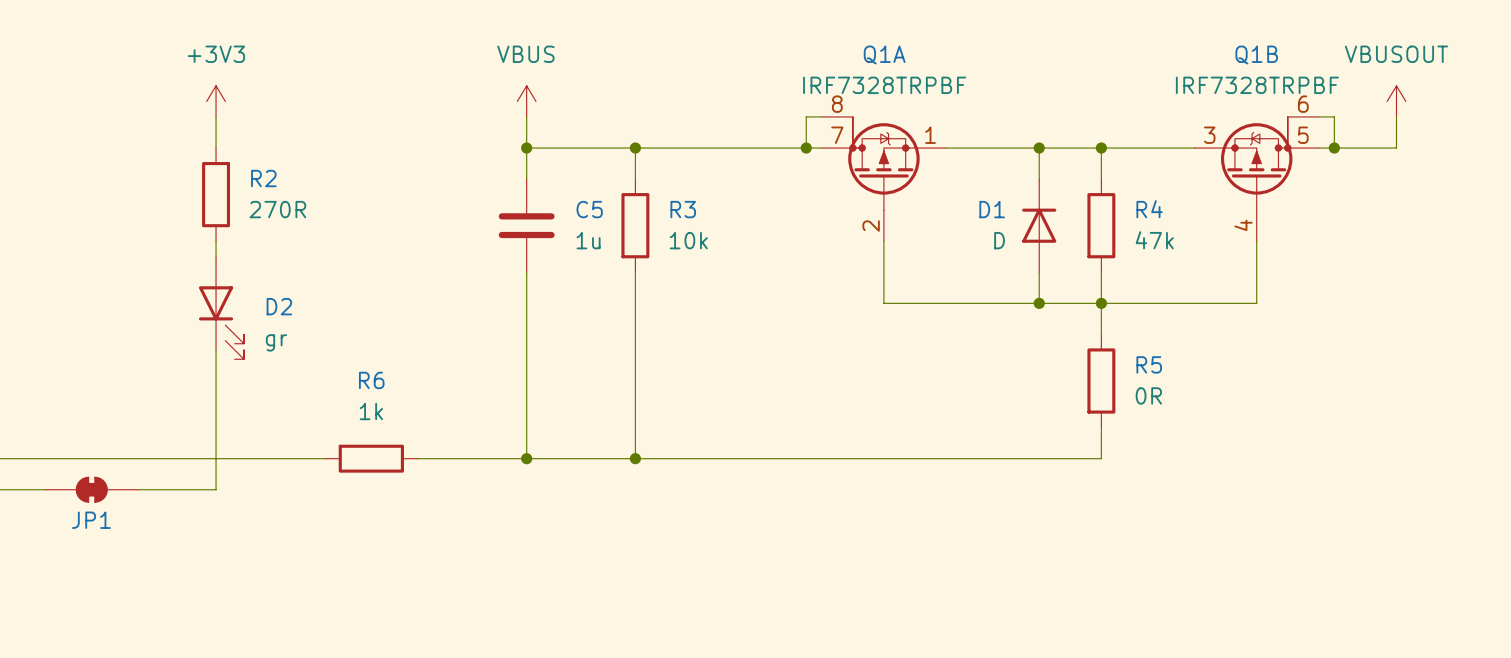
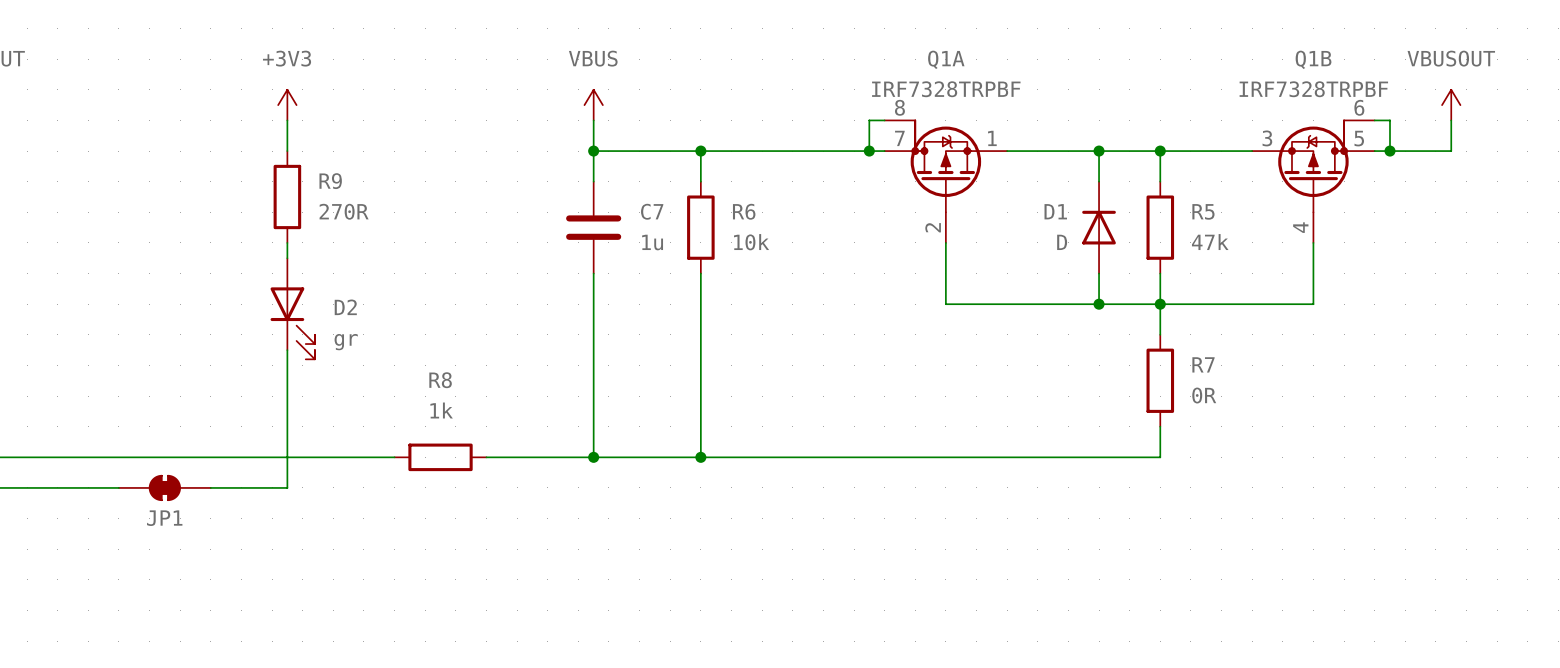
R2 name: R2 (263, 178) -> R9 (330, 181)
C5 name: C5 (589, 209) -> C7 (652, 211)
R3 name: R3 (683, 209) -> R6 (744, 211)
R4 name: R4 (1149, 209) -> R5 (1203, 211)
R5 name: R5 (1149, 364) -> R7 (1203, 364)
R6 name: R6 (371, 380) -> R8 (440, 380)

